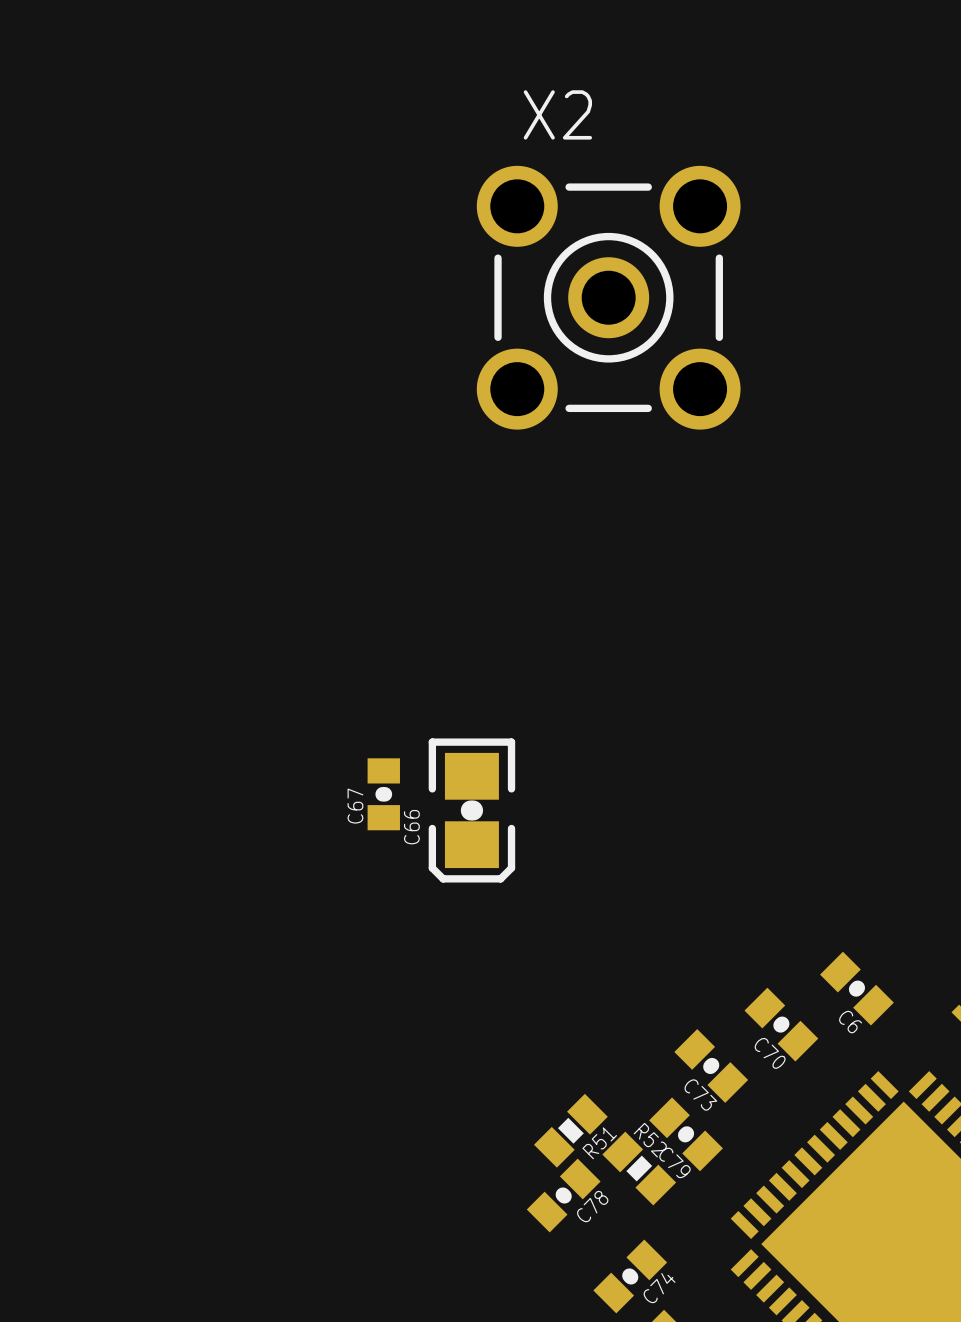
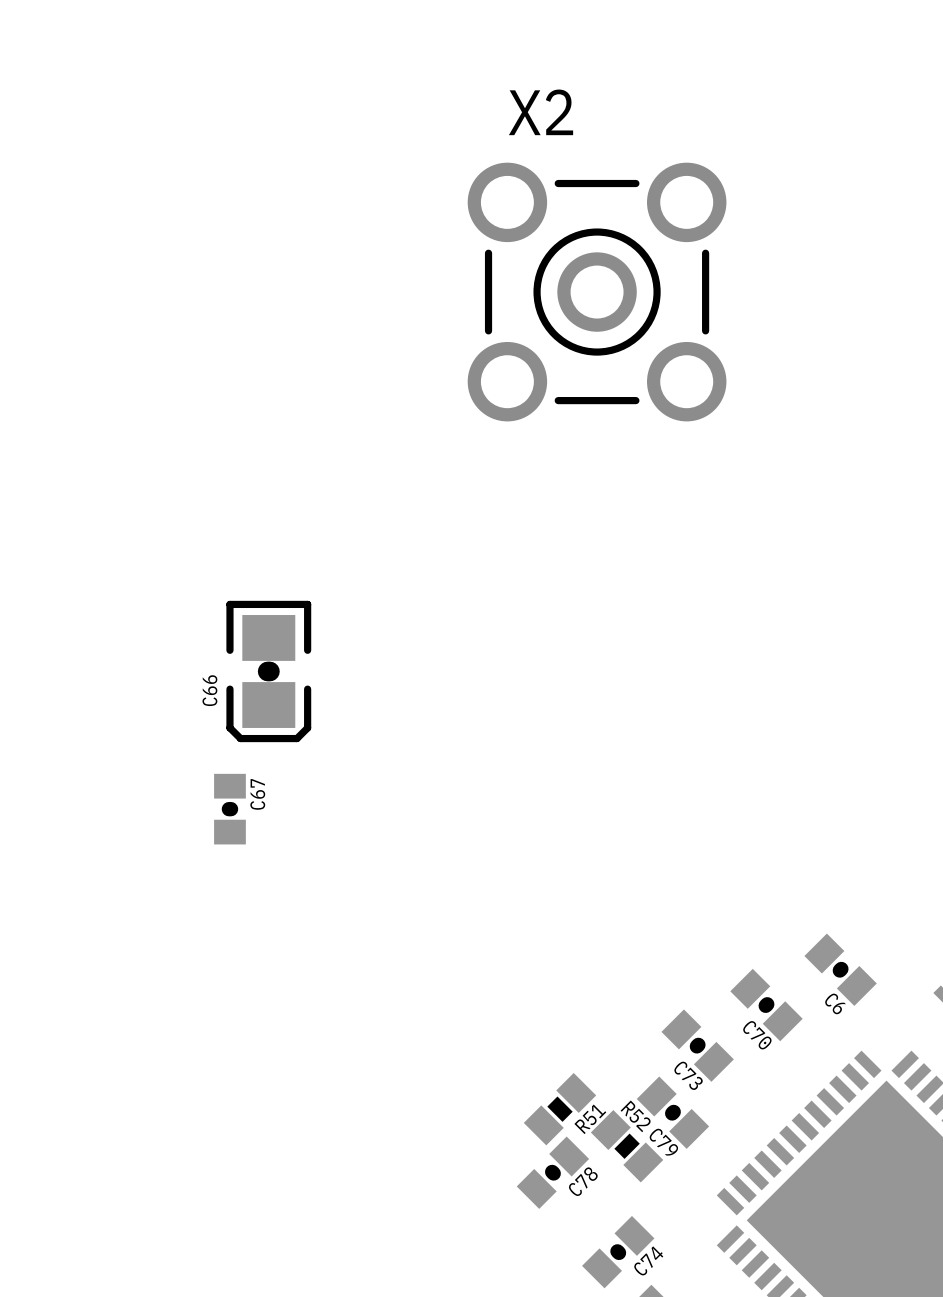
C67 position: (383, 794) -> (229, 809)
C67 name position: C67 (355, 806) -> C67 (257, 794)
C66 position: (471, 810) -> (268, 671)

